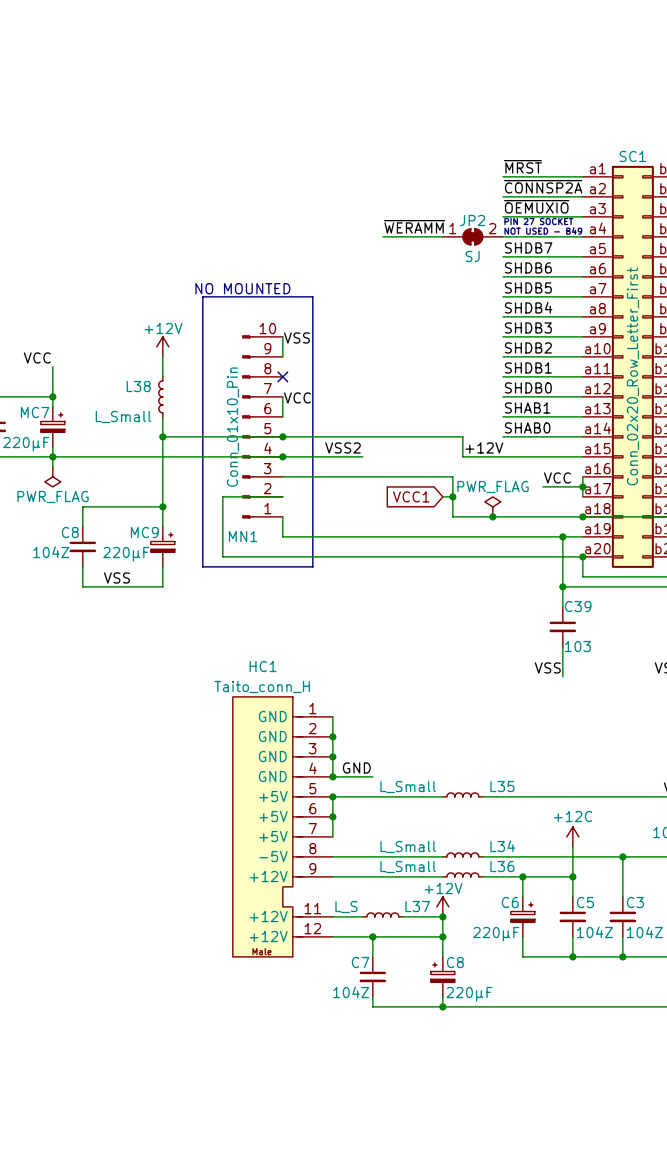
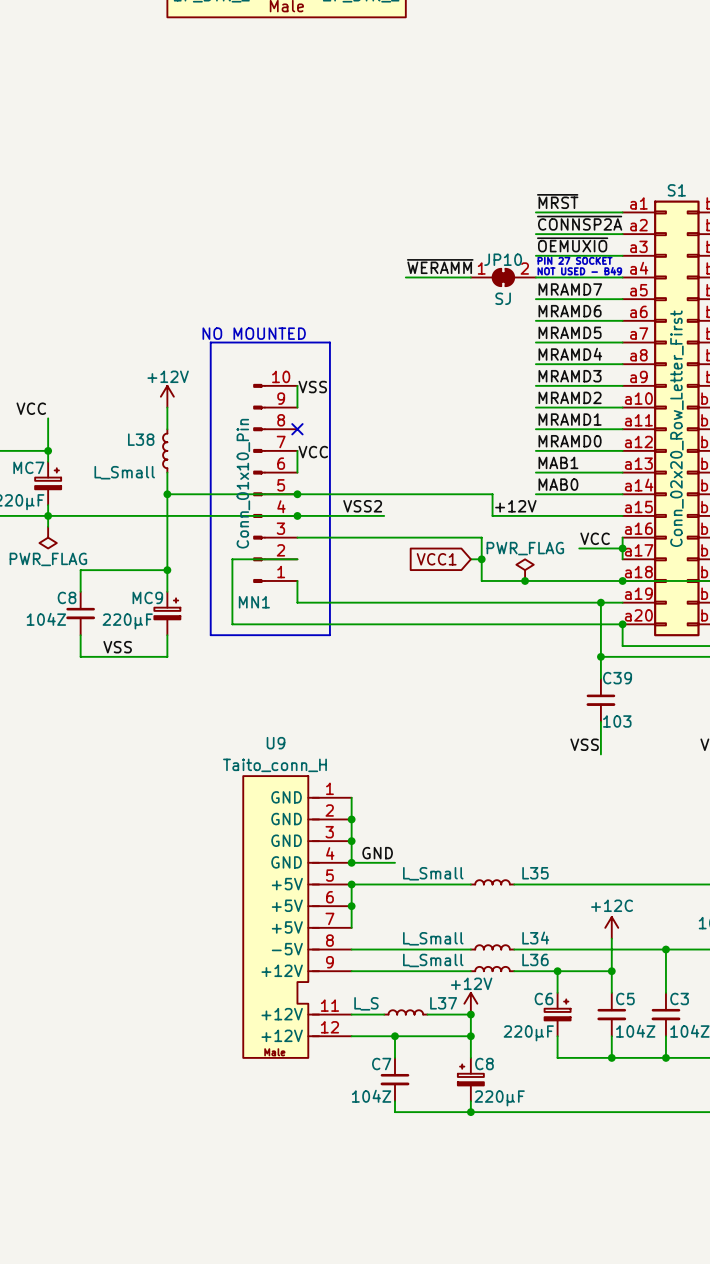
SC1 name: SC1 (632, 156) -> S1 (676, 190)
JP2 name: JP2 (472, 220) -> JP10 (503, 259)
label: SHDB7 (528, 247) -> MRAMD7 (570, 289)
label: SHDB6 (528, 267) -> MRAMD6 (570, 311)
label: SHDB5 (528, 287) -> MRAMD5 (570, 332)
label: SHDB4 (528, 307) -> MRAMD4 (570, 354)
label: SHDB3 (528, 327) -> MRAMD3 (570, 376)
label: SHDB2 (528, 347) -> MRAMD2 (570, 397)
label: SHDB1 (528, 367) -> MRAMD1 (570, 419)
label: SHDB0 (528, 387) -> MRAMD0 (570, 441)
label: SHAB1 (527, 407) -> MAB1 (558, 462)
label: SHAB0 (527, 427) -> MAB0 (558, 484)
HC1 name: HC1 (263, 666) -> U9 (276, 743)

